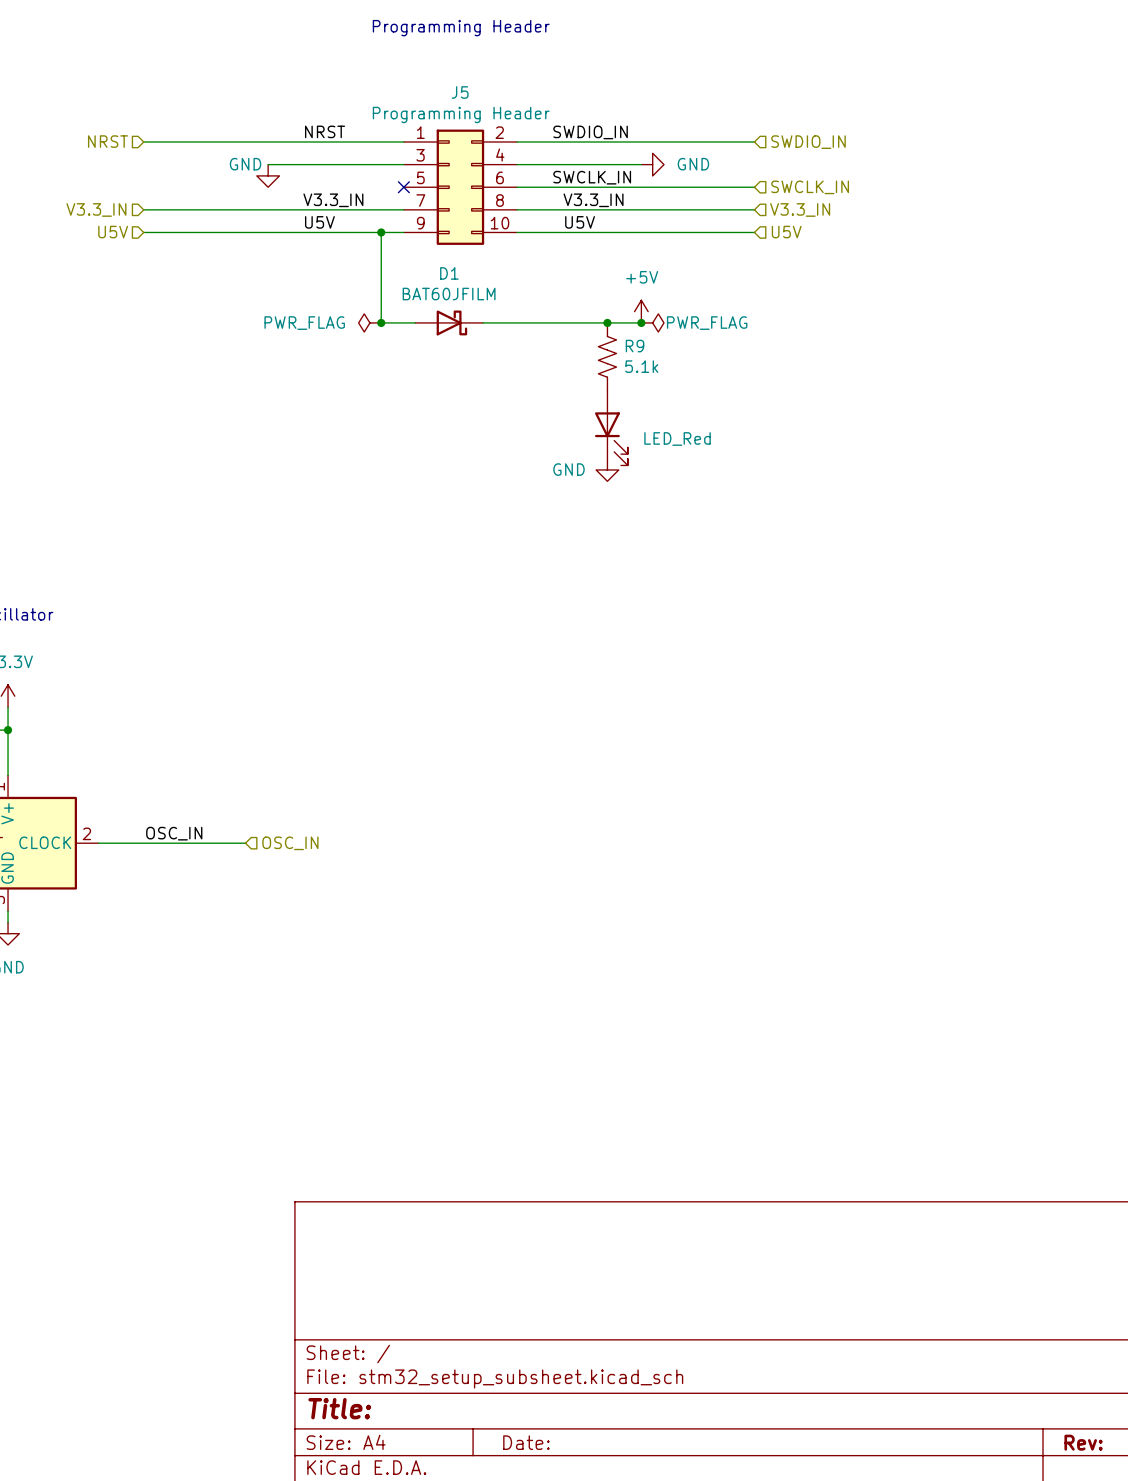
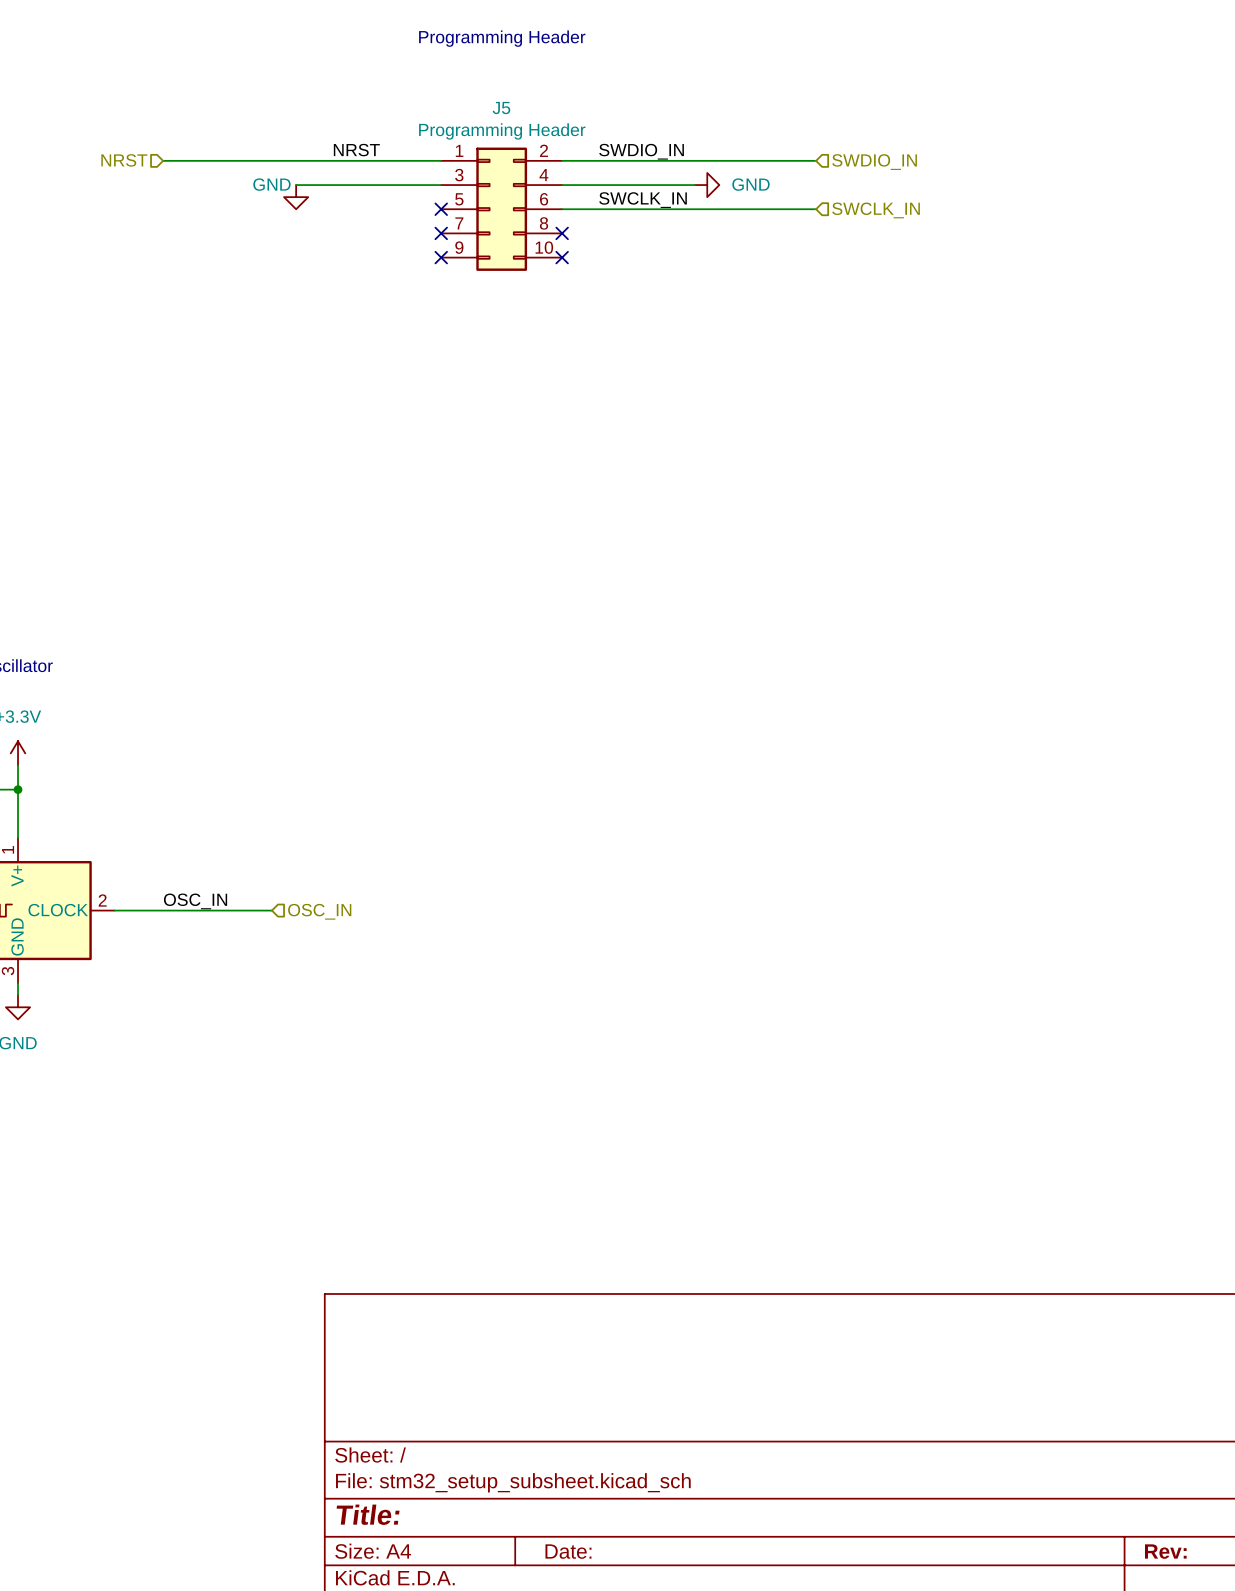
label: V3.3_IN (333, 200) -> none
label: V3.3_IN (593, 200) -> none
hierarchical label: V3.3_IN (96, 209) -> none
wire: (143, 209) (403, 209) -> none
no-connect mark: none -> (441, 233)
wire: (516, 209) (754, 209) -> none
no-connect mark: none -> (562, 233)
hierarchical label: V3.3_IN (800, 209) -> none
label: U5V (319, 222) -> none
label: U5V (580, 222) -> none
hierarchical label: U5V (113, 232) -> none
wire: (143, 232) (403, 232) -> none
wire: (381, 232) (381, 322) (415, 322) -> none
junction: (381, 232) -> none
no-connect mark: none -> (441, 257)
wire: (516, 232) (754, 232) -> none
no-connect mark: none -> (562, 257)
hierarchical label: U5V (786, 232) -> none
power symbol: +5V (641, 311) -> none
power symbol: PWR_FLAG (369, 322) -> none
junction: (381, 322) -> none
D1: BAT60JFILM (449, 322) -> none
wire: (483, 322) (641, 322) -> none
junction: (607, 322) -> none
junction: (641, 322) -> none
power symbol: PWR_FLAG (652, 322) -> none
R9: 5.1k (607, 356) -> none
part: LED_Red (611, 428) -> none
power symbol: GND (607, 469) -> none

